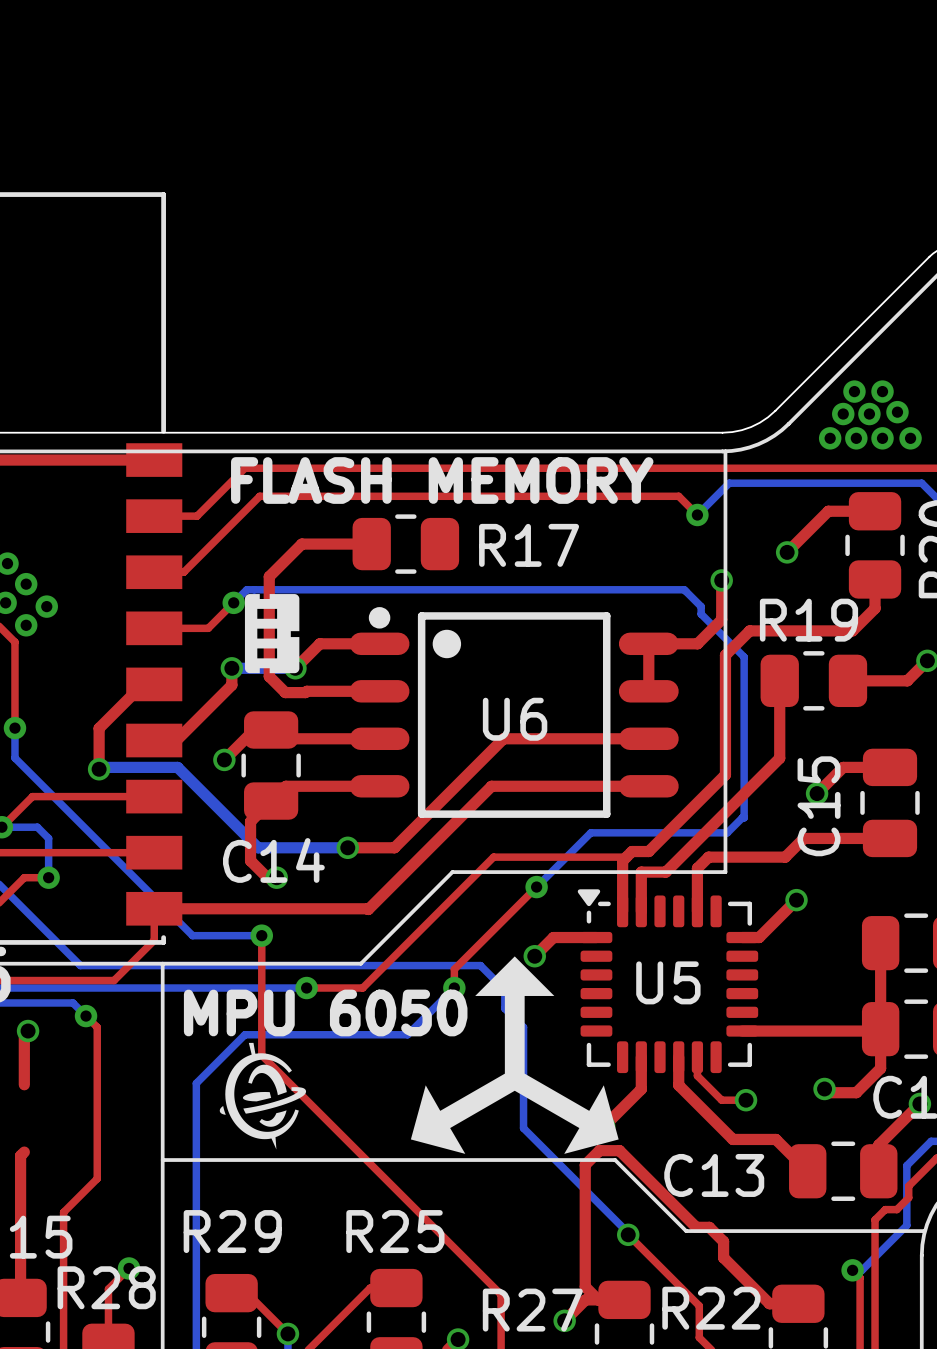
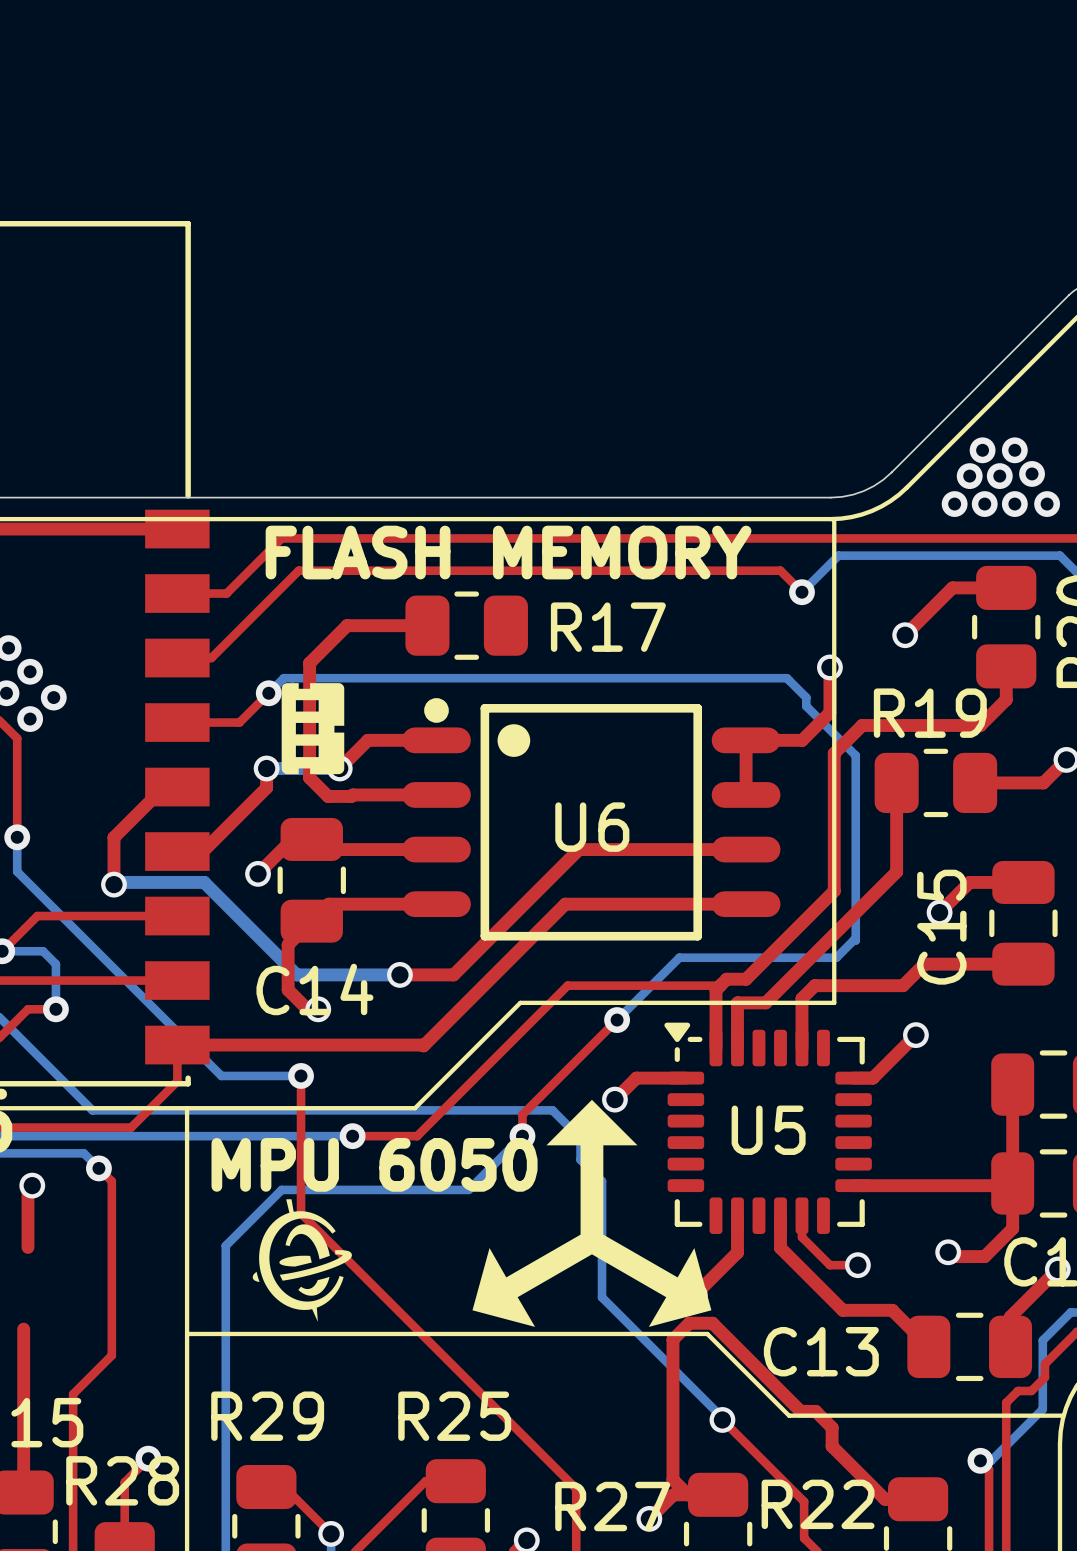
top track: (24, 1152) (20, 1155) -> none

